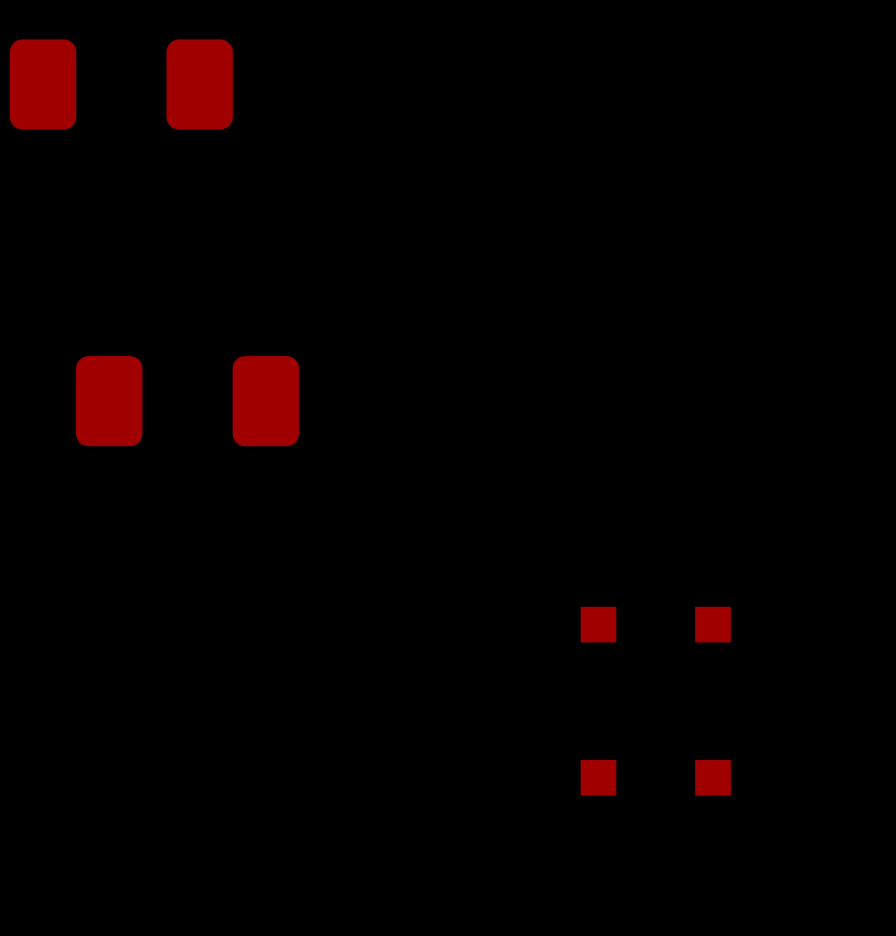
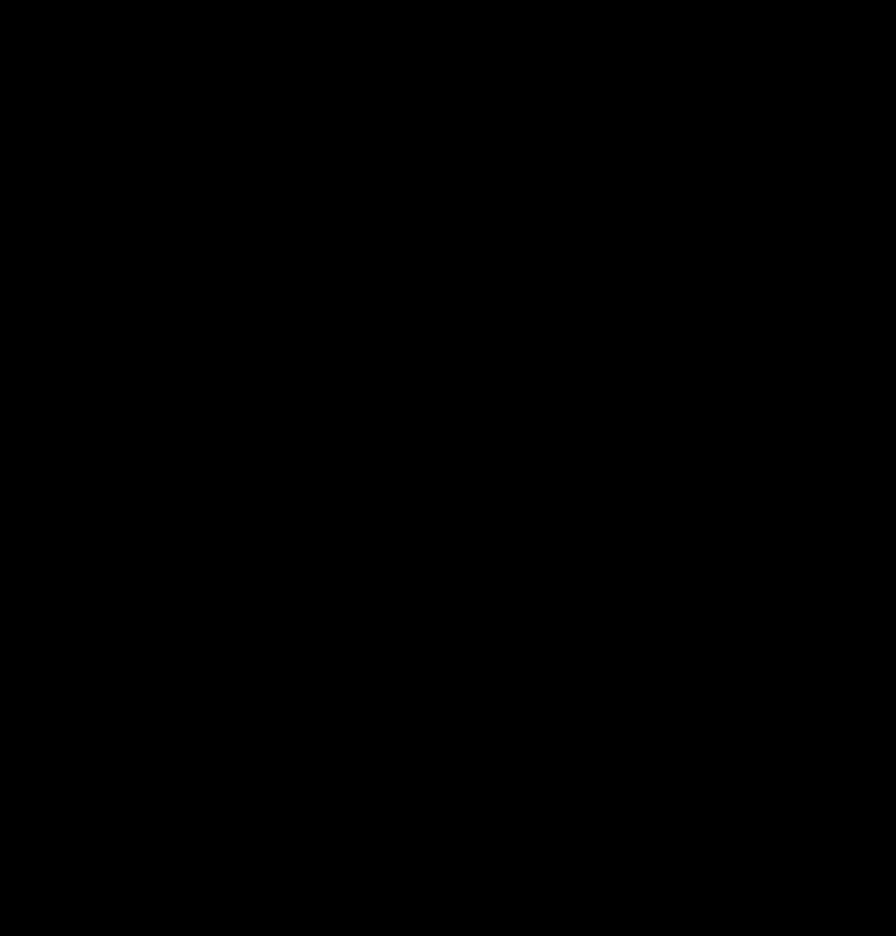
part: (121, 84) -> none
part: (187, 401) -> none
part: (655, 624) -> none
part: (655, 777) -> none

